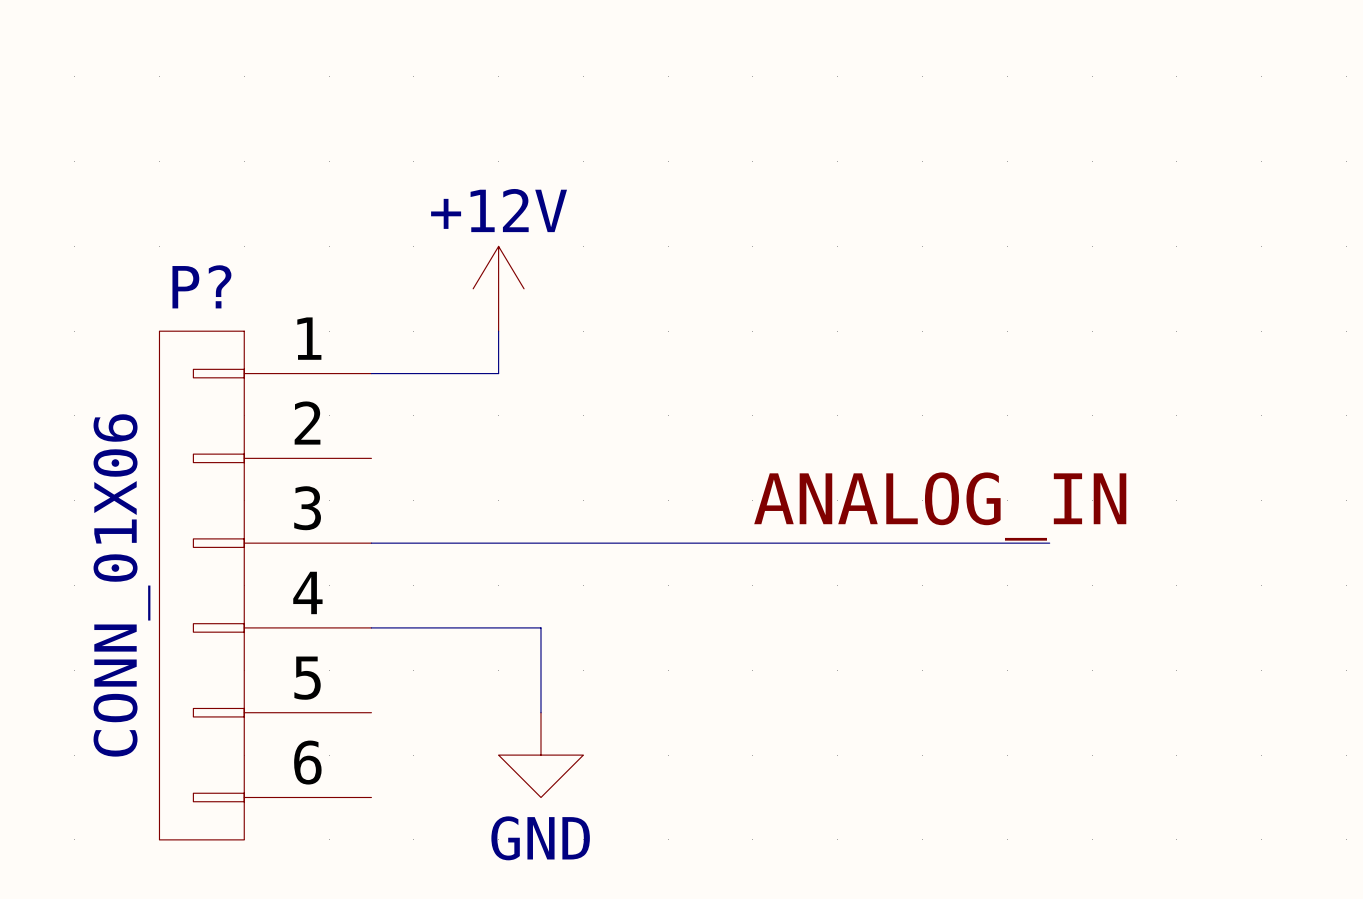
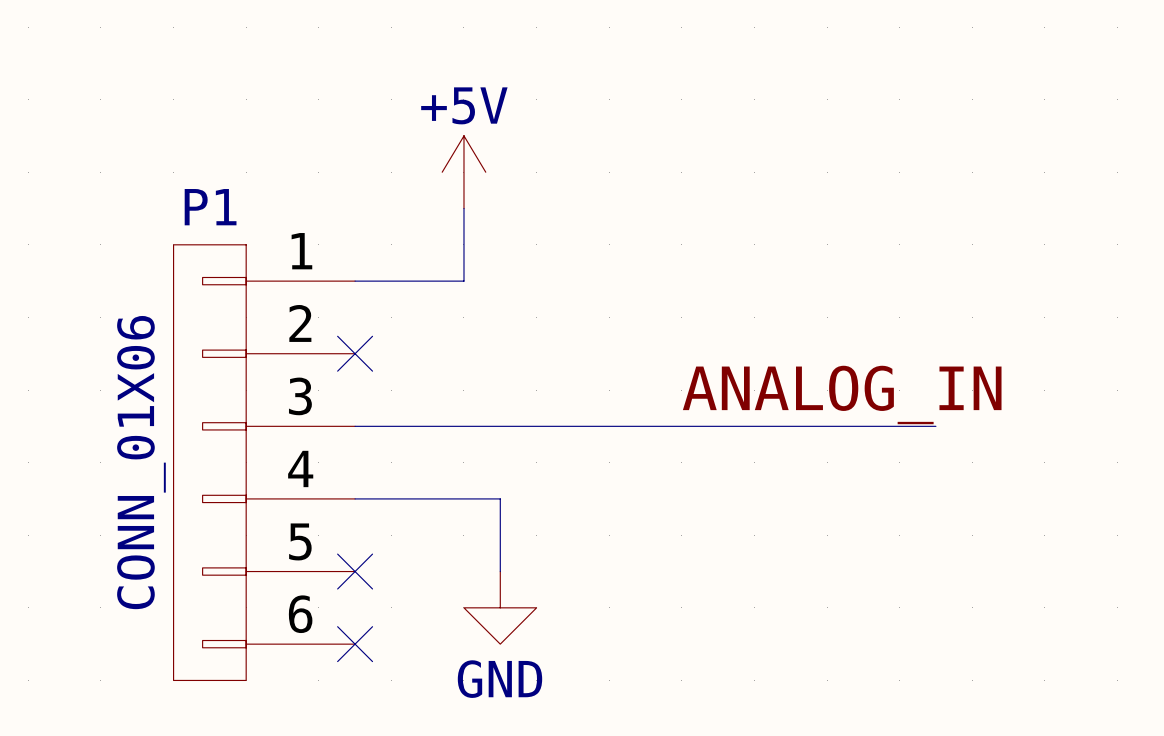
power symbol: none -> +5V (463, 172)
P? name: P? (201, 286) -> P1 (210, 207)
power symbol: +12V (498, 288) -> none
no-connect mark: none -> (355, 353)
no-connect mark: none -> (355, 571)
no-connect mark: none -> (355, 644)

